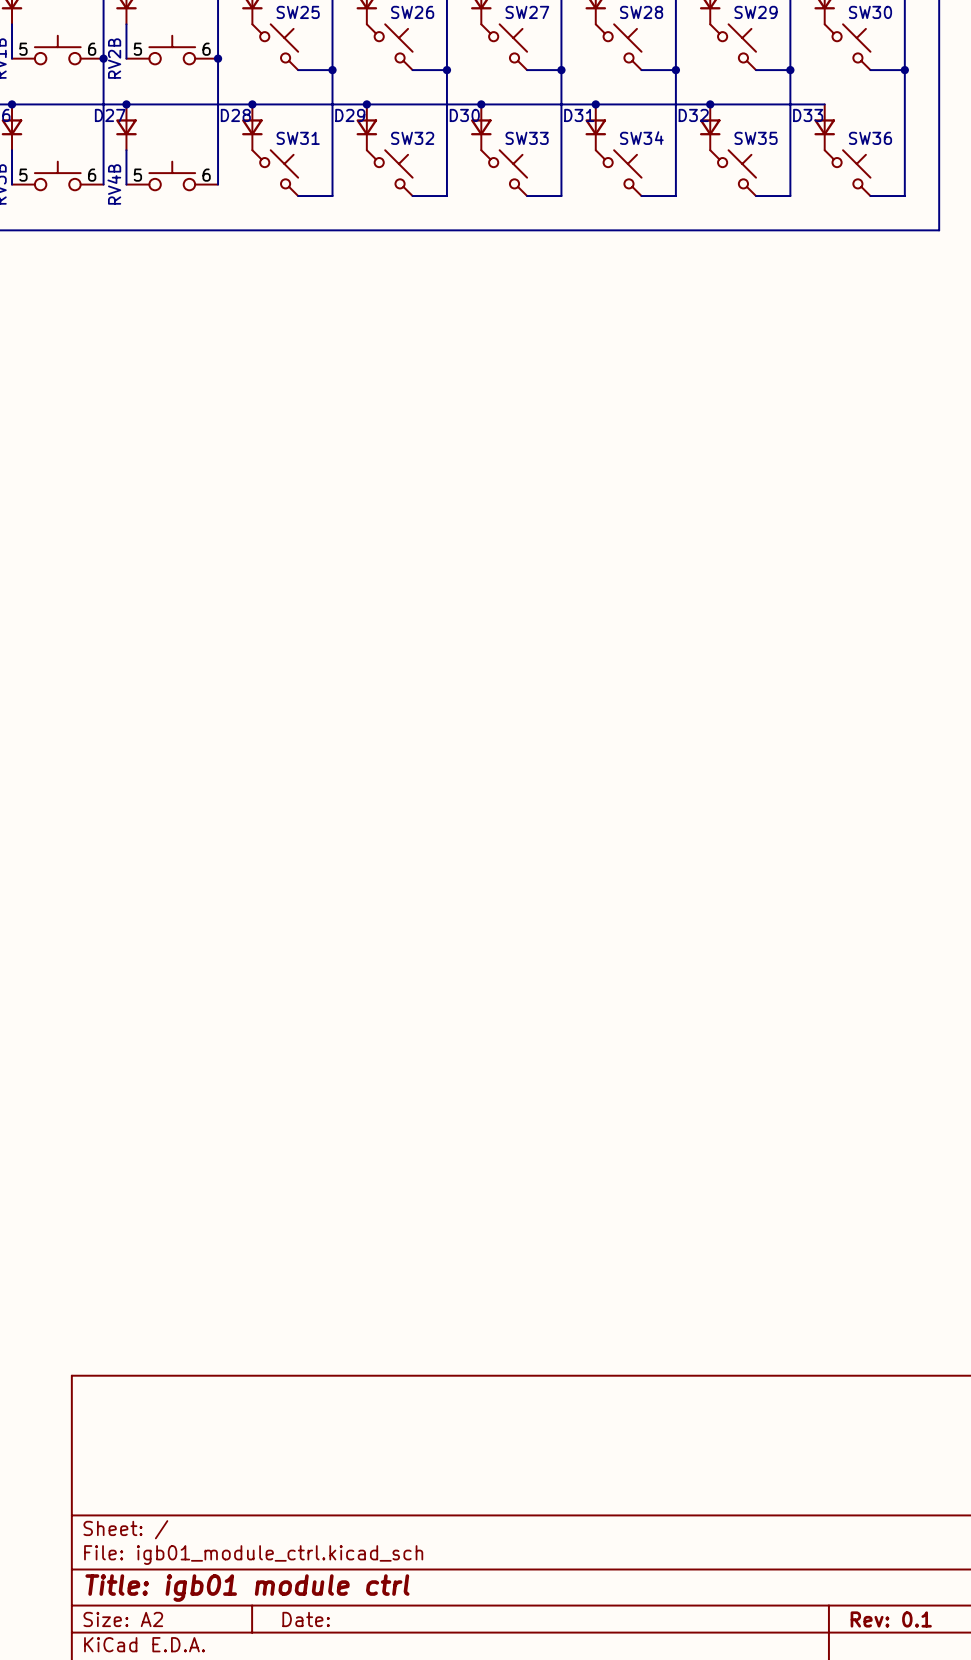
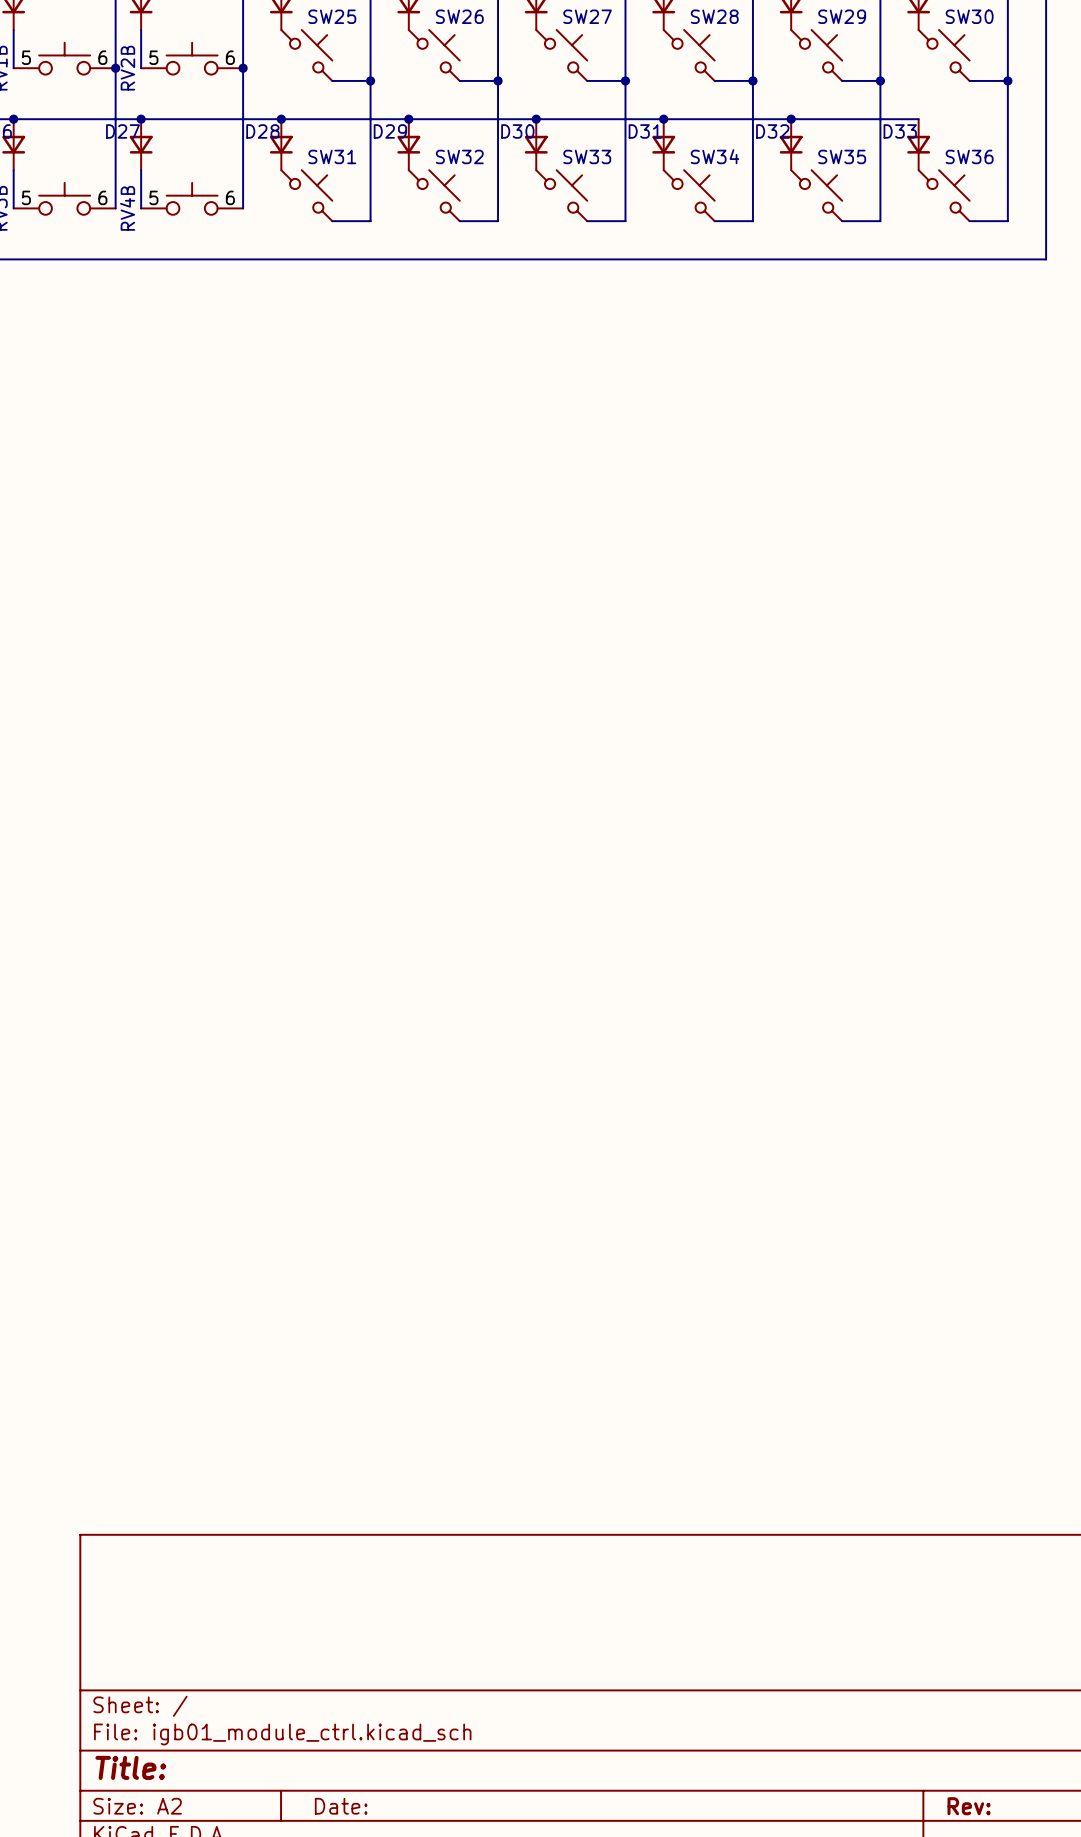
title block: Title: igb01 module ctrl (247, 1588) -> Title: (130, 1767)
title block: Rev: 0.1 (891, 1619) -> Rev: (969, 1806)

